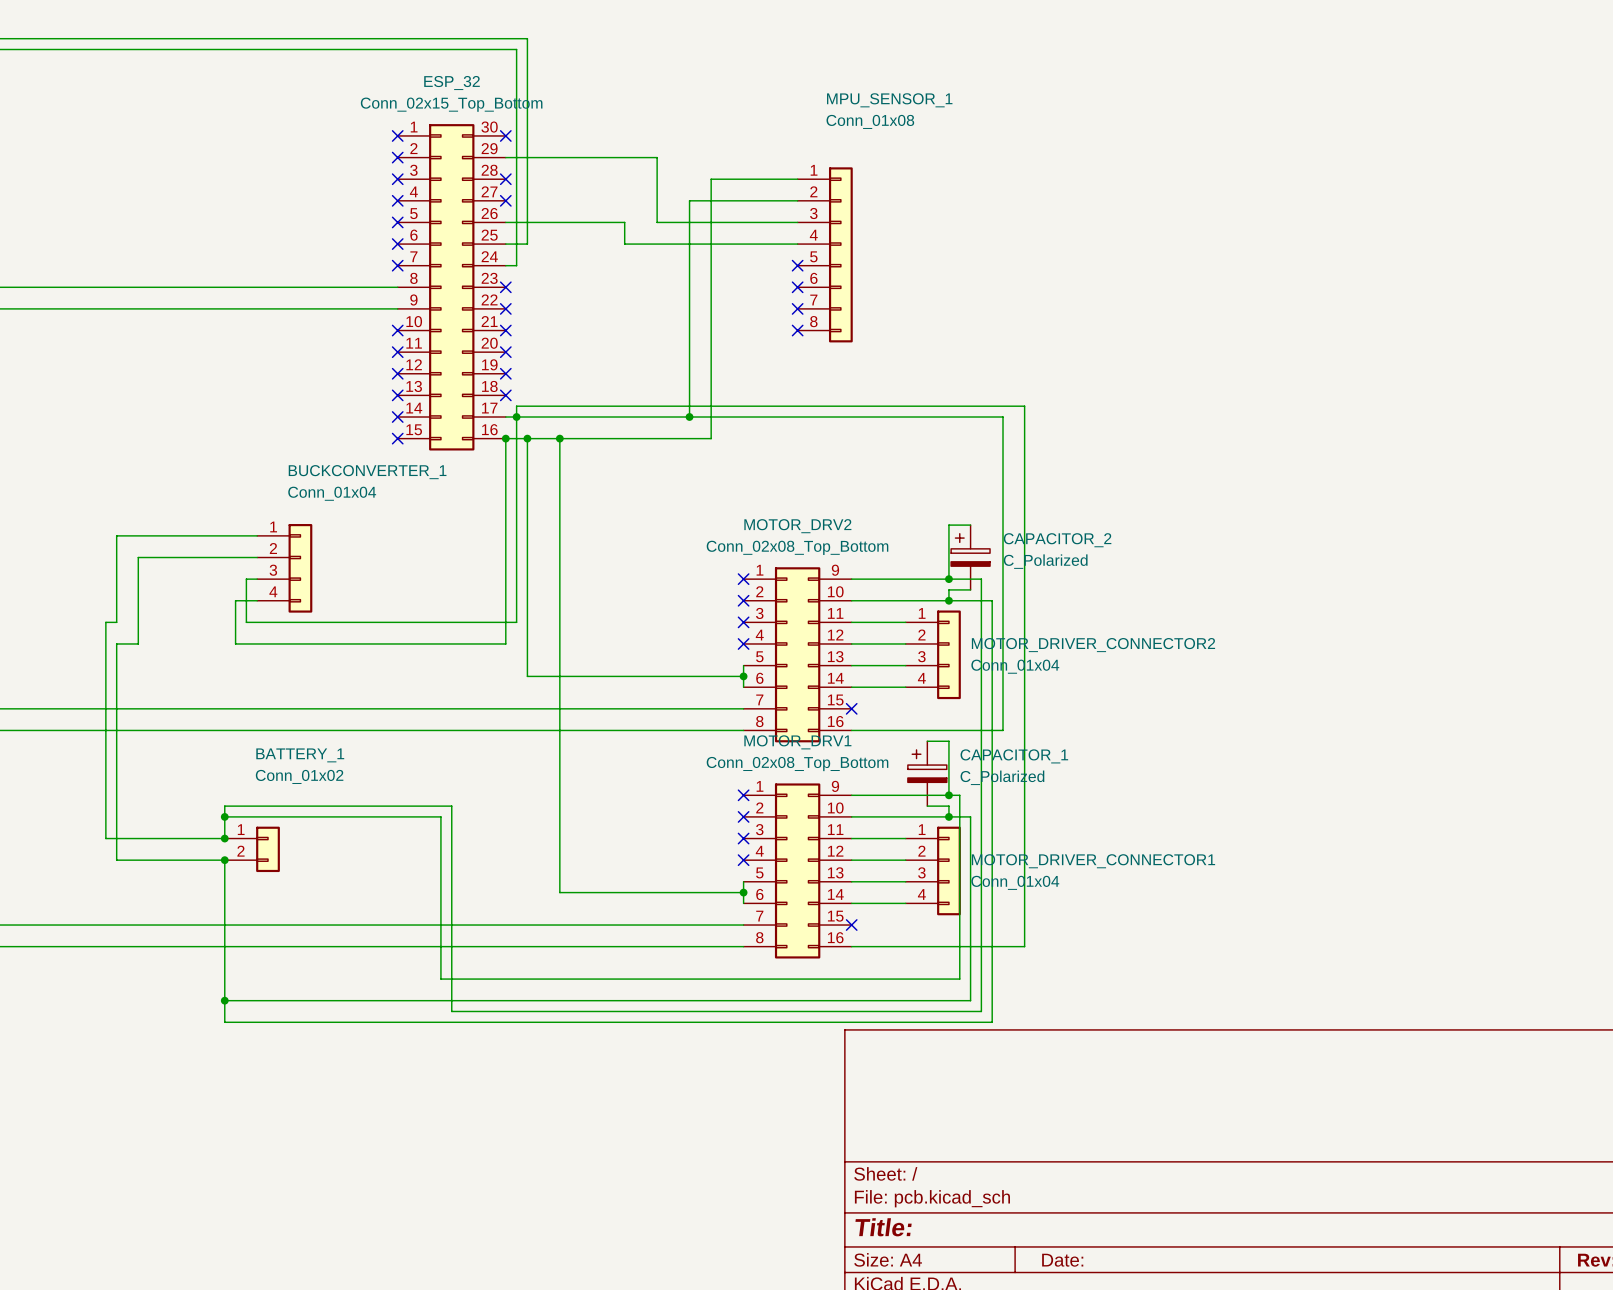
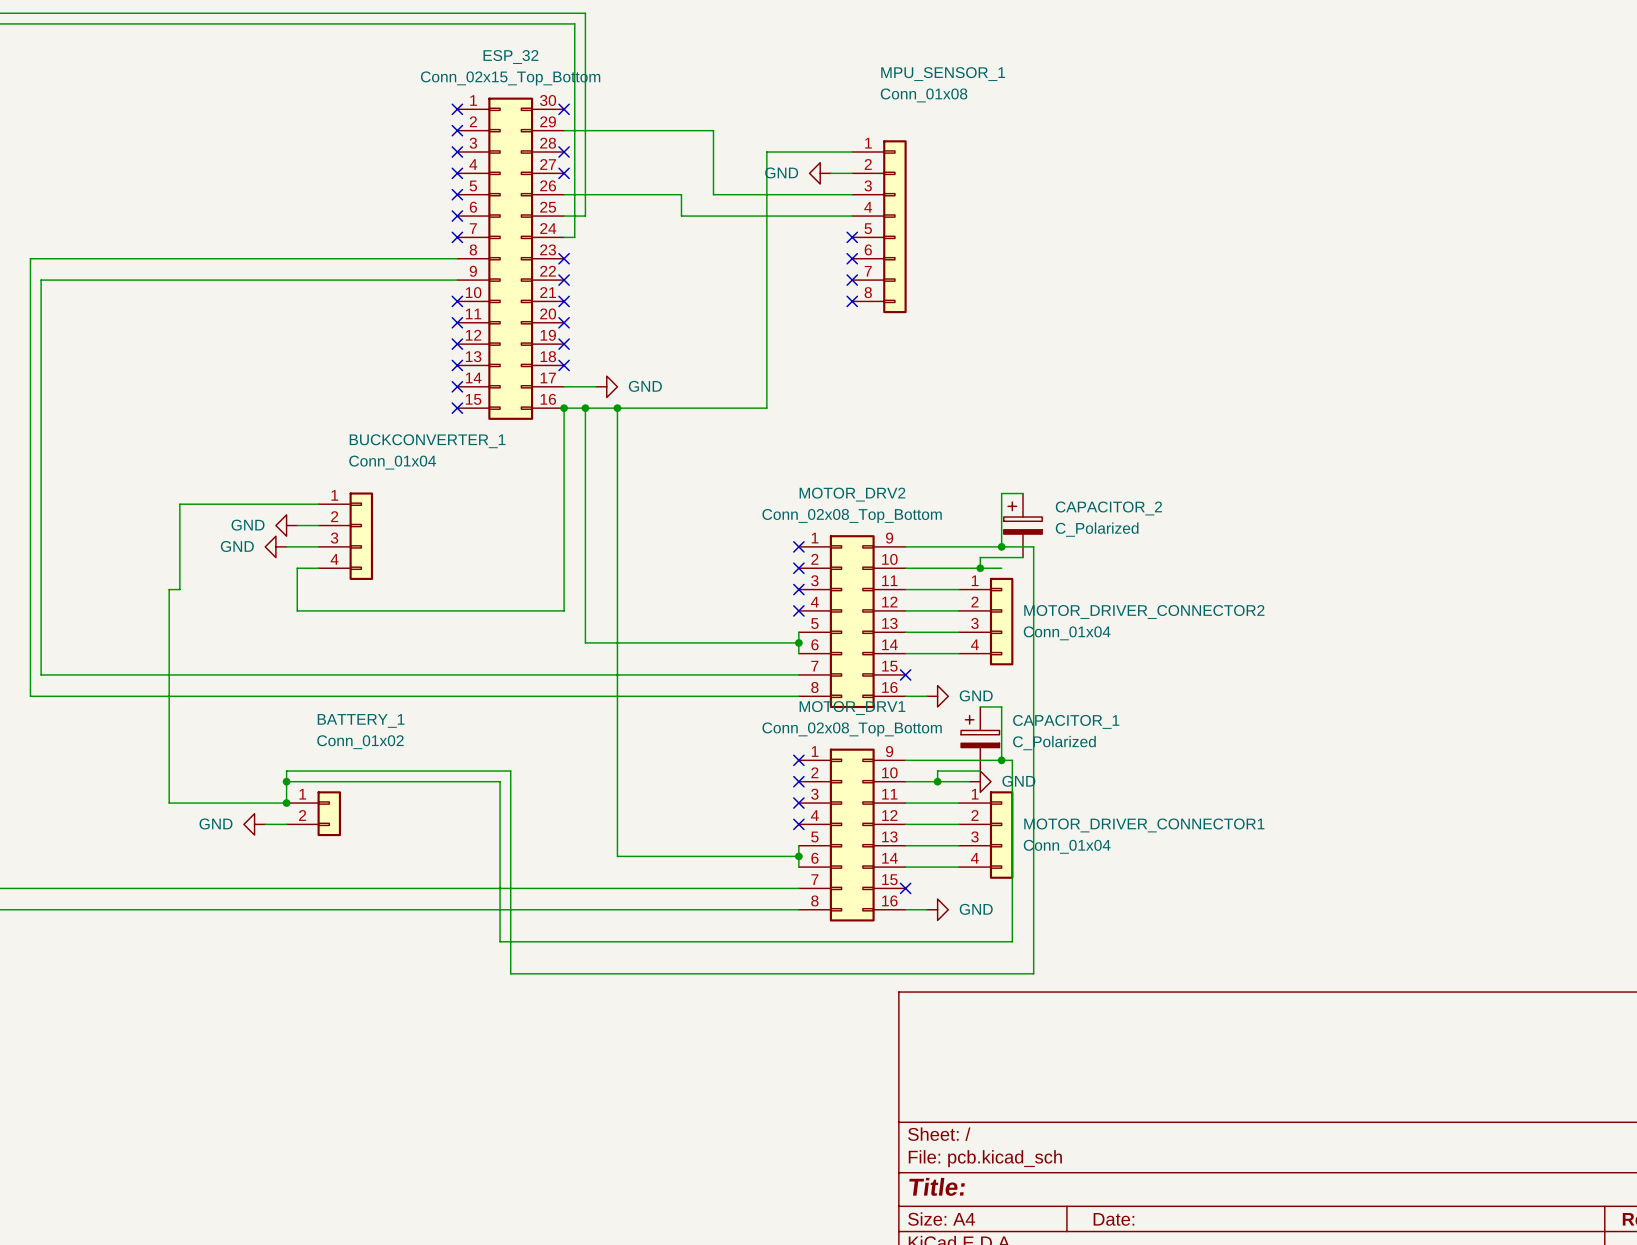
power symbol: none -> GND (820, 173)
wire: (776, 200) (689, 200) (689, 417) -> none
junction: (516, 417) -> none
wire: (538, 417) (1003, 417) (1003, 730) (873, 730) -> none
power symbol: none -> GND (606, 386)
junction: (689, 417) -> none
power symbol: none -> GND (286, 525)
wire: (235, 557) (138, 557) (138, 643) (116, 643) (116, 860) (203, 860) -> none
power symbol: none -> GND (275, 546)
wire: (246, 579) (246, 622) (516, 622) (516, 406) (1024, 406) (1024, 946) (873, 946) -> (307, 546) (286, 546)
wire: (948, 589) (948, 600) (992, 600) (992, 1022) (224, 1022) (224, 860) -> (1001, 557) (980, 557) (980, 568)
junction position: (948, 600) -> (980, 568)
power symbol: none -> GND (937, 696)
wire: (927, 806) (948, 806) (948, 816) -> (980, 771) (937, 771) (937, 781)
junction: none -> (937, 781)
wire: (916, 816) (970, 816) (970, 1000) (224, 1000) -> none
power symbol: none -> GND (980, 781)
junction: (948, 816) -> none
power symbol: none -> GND (254, 824)
junction: (224, 860) -> none
power symbol: none -> GND (937, 909)
junction: (224, 1000) -> none

